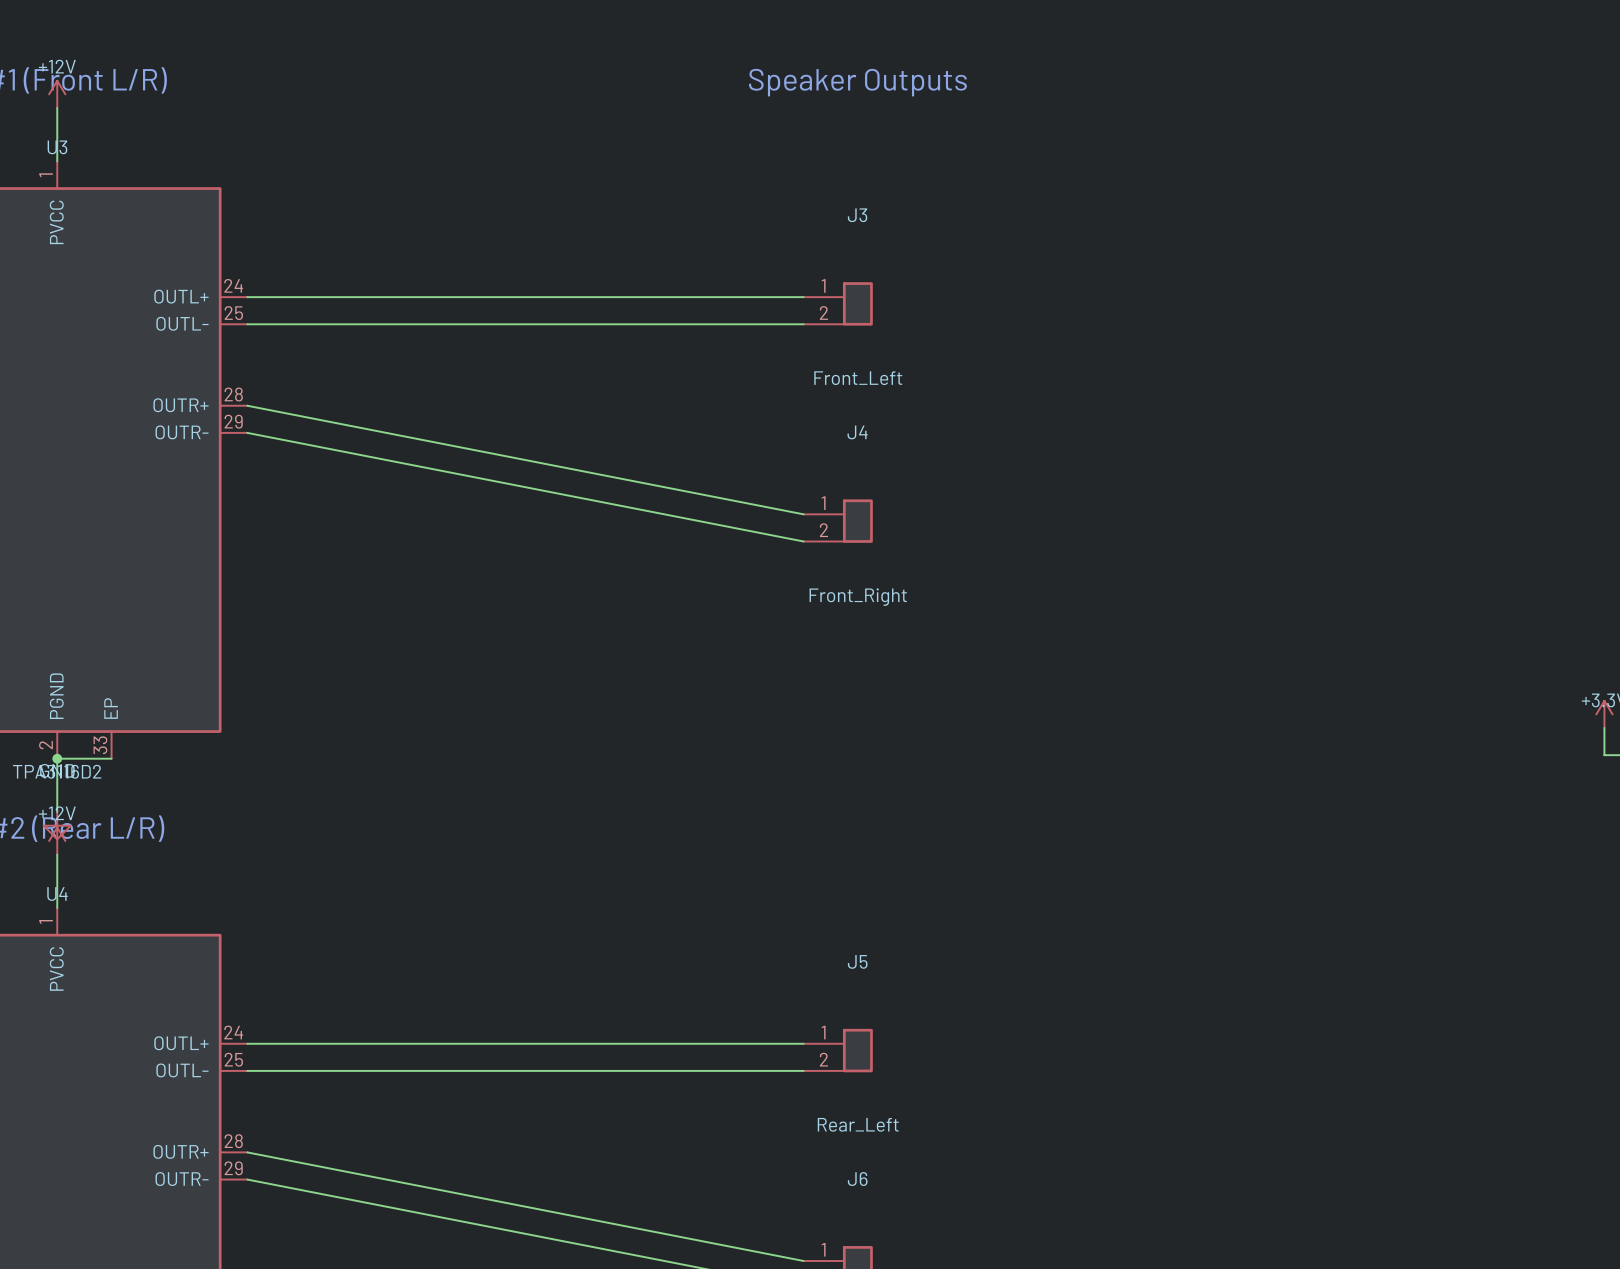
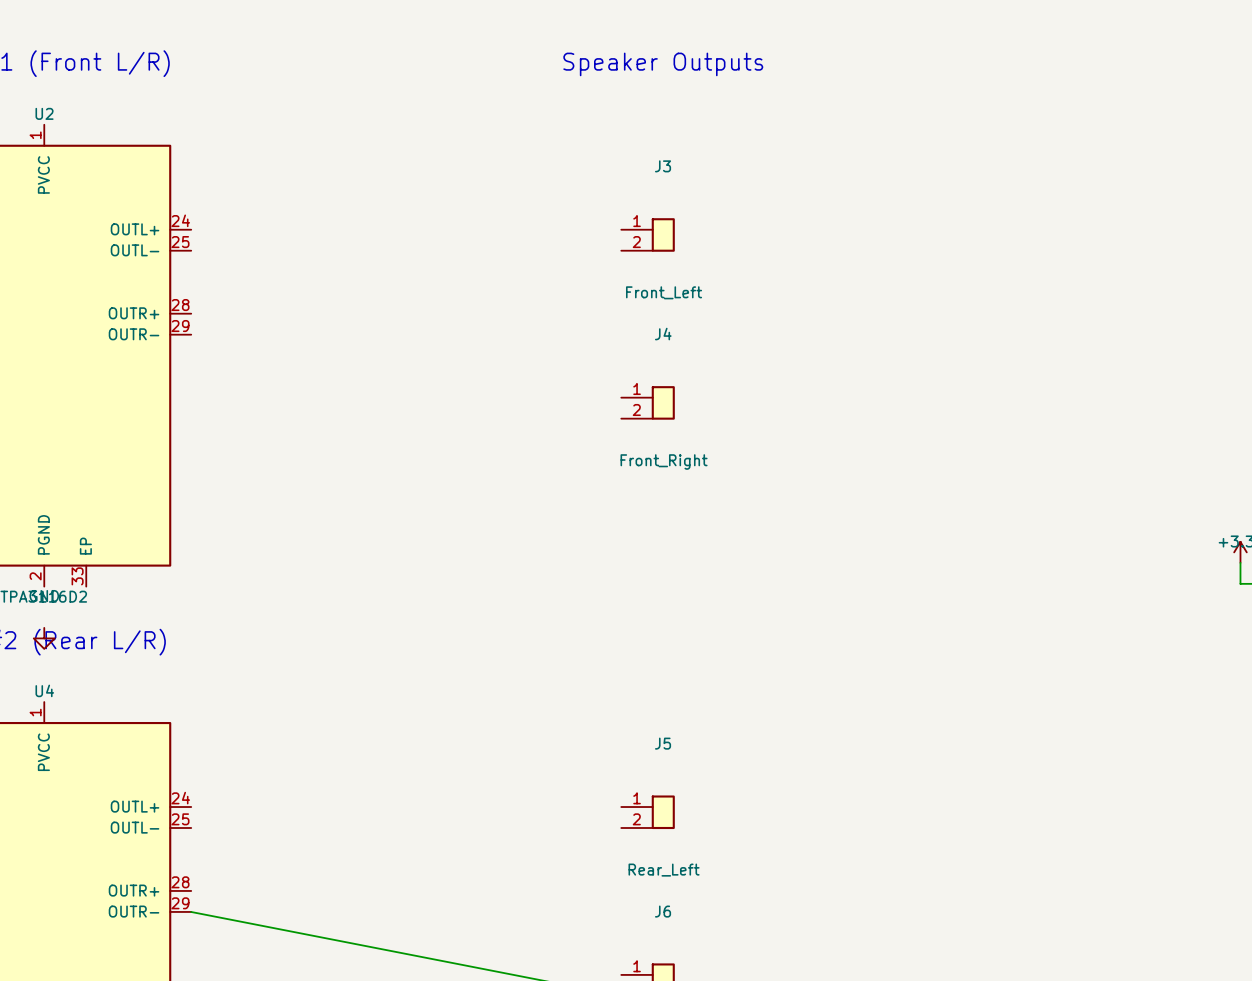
power symbol: +12V (57, 94) -> none
wire: (57, 107) (57, 161) -> none
U3 name: U3 (57, 147) -> U2 (44, 113)
wire: (247, 297) (803, 297) -> none
wire: (247, 324) (803, 324) -> none
wire: (247, 405) (803, 514) -> none
wire: (247, 432) (803, 541) -> none
junction: (57, 758) -> none
wire: (111, 758) (57, 758) (57, 812) -> none
power symbol: +12V (57, 841) -> none
wire: (57, 854) (57, 908) -> none
wire: (247, 1043) (803, 1043) -> none
wire: (247, 1070) (803, 1070) -> none
wire: (247, 1152) (803, 1260) -> none

